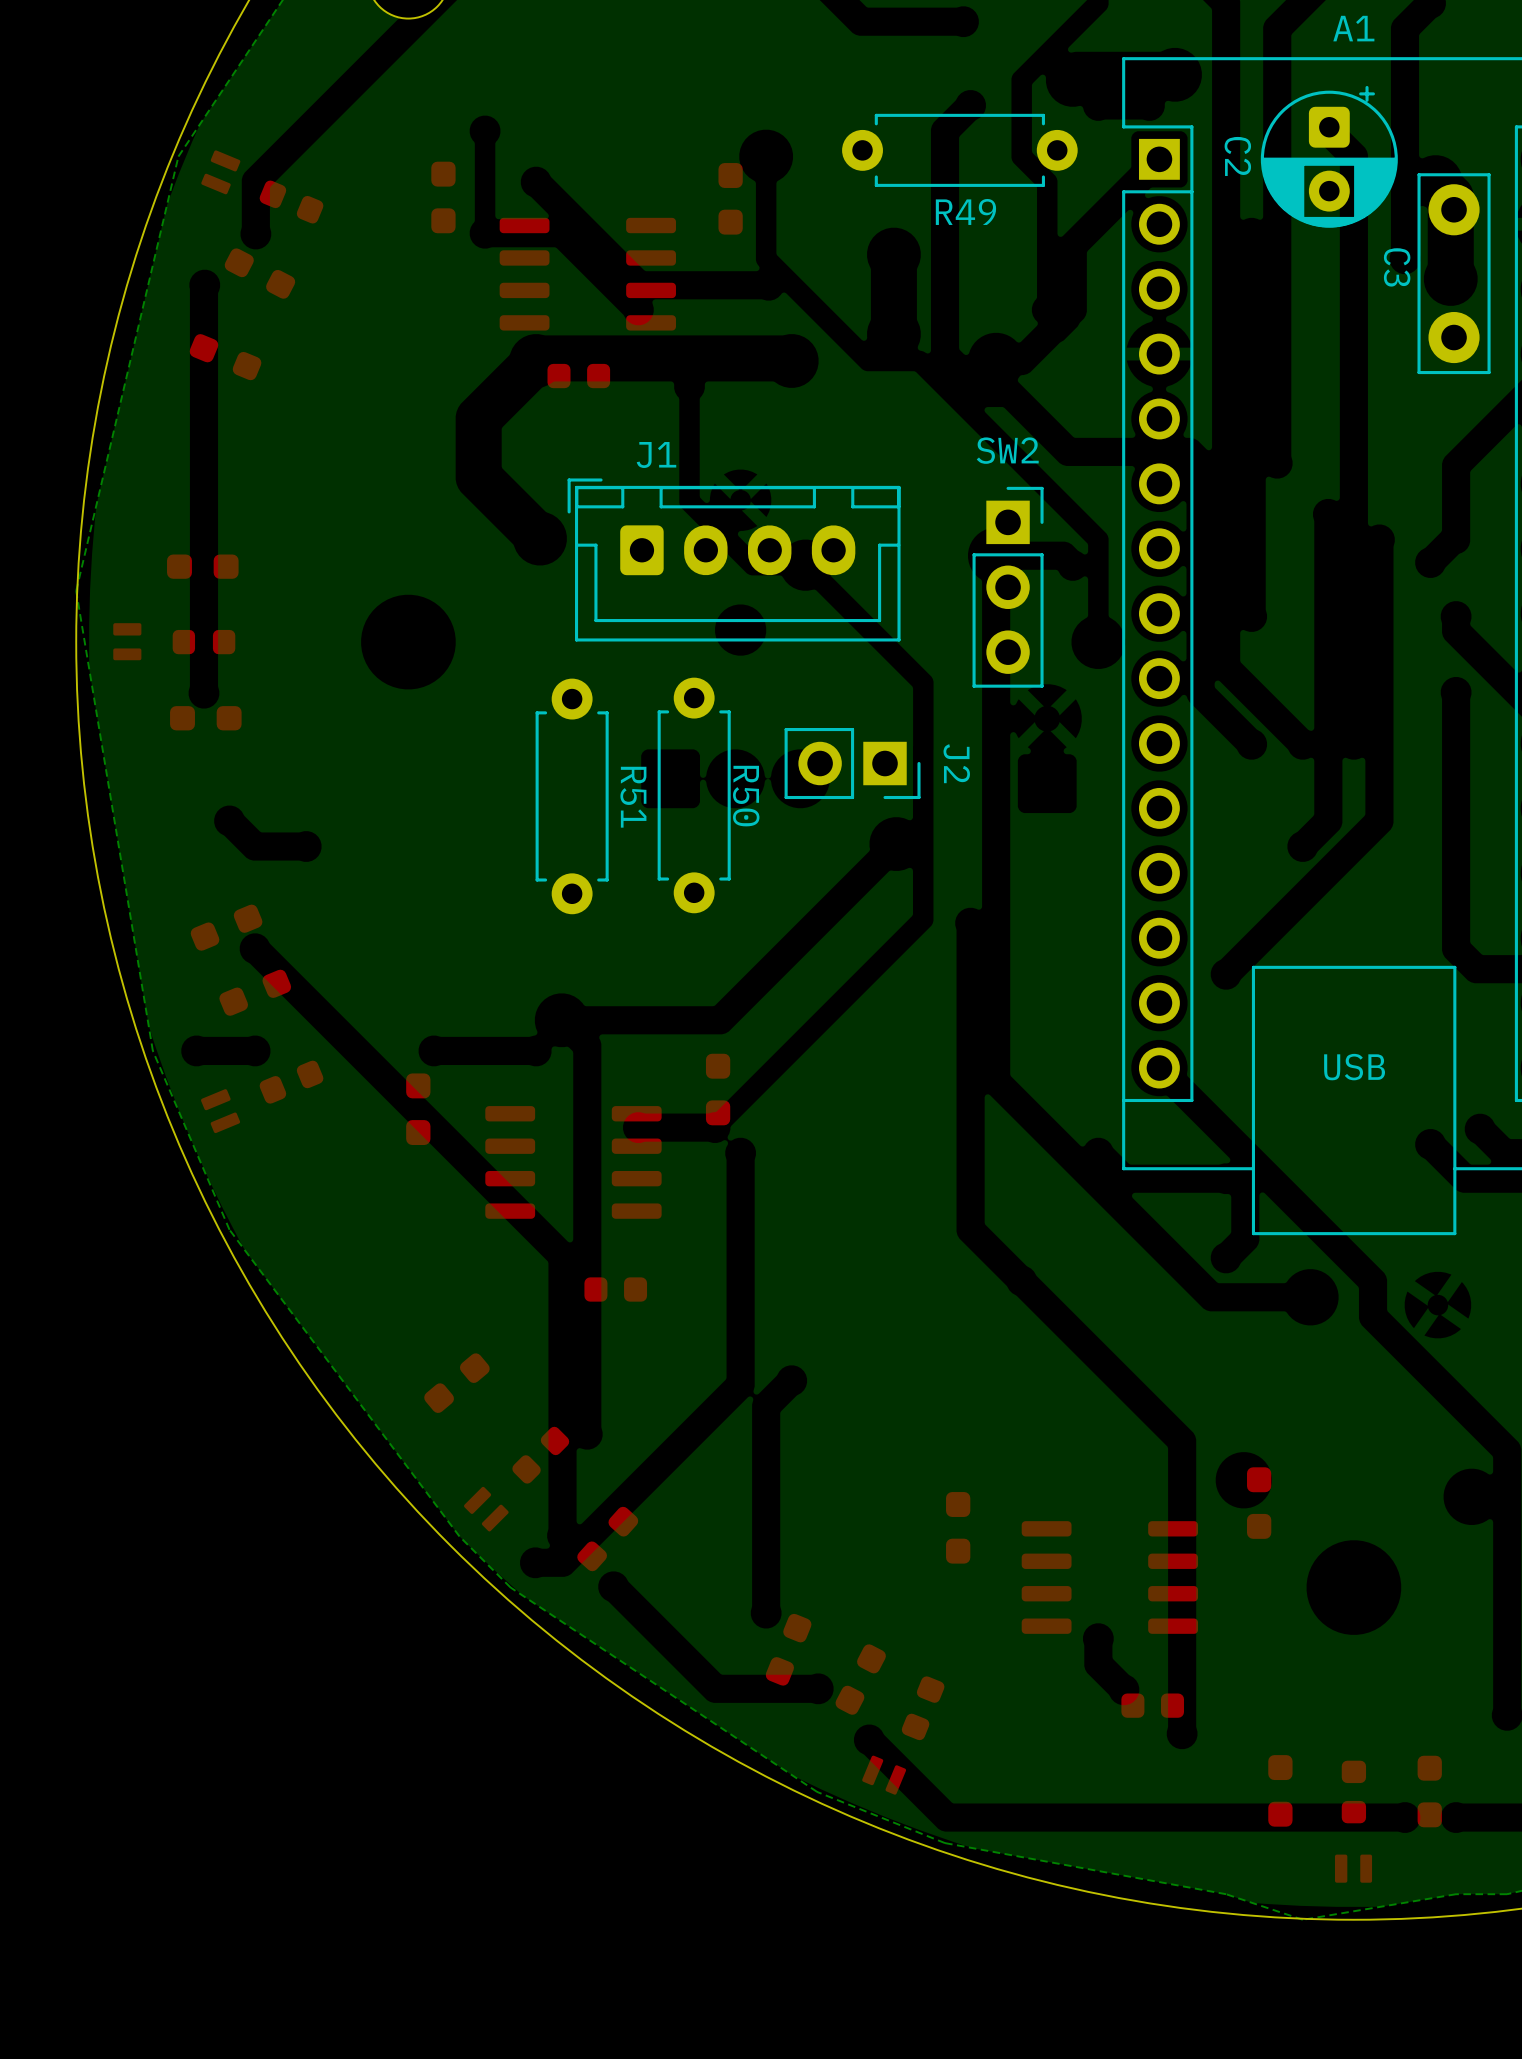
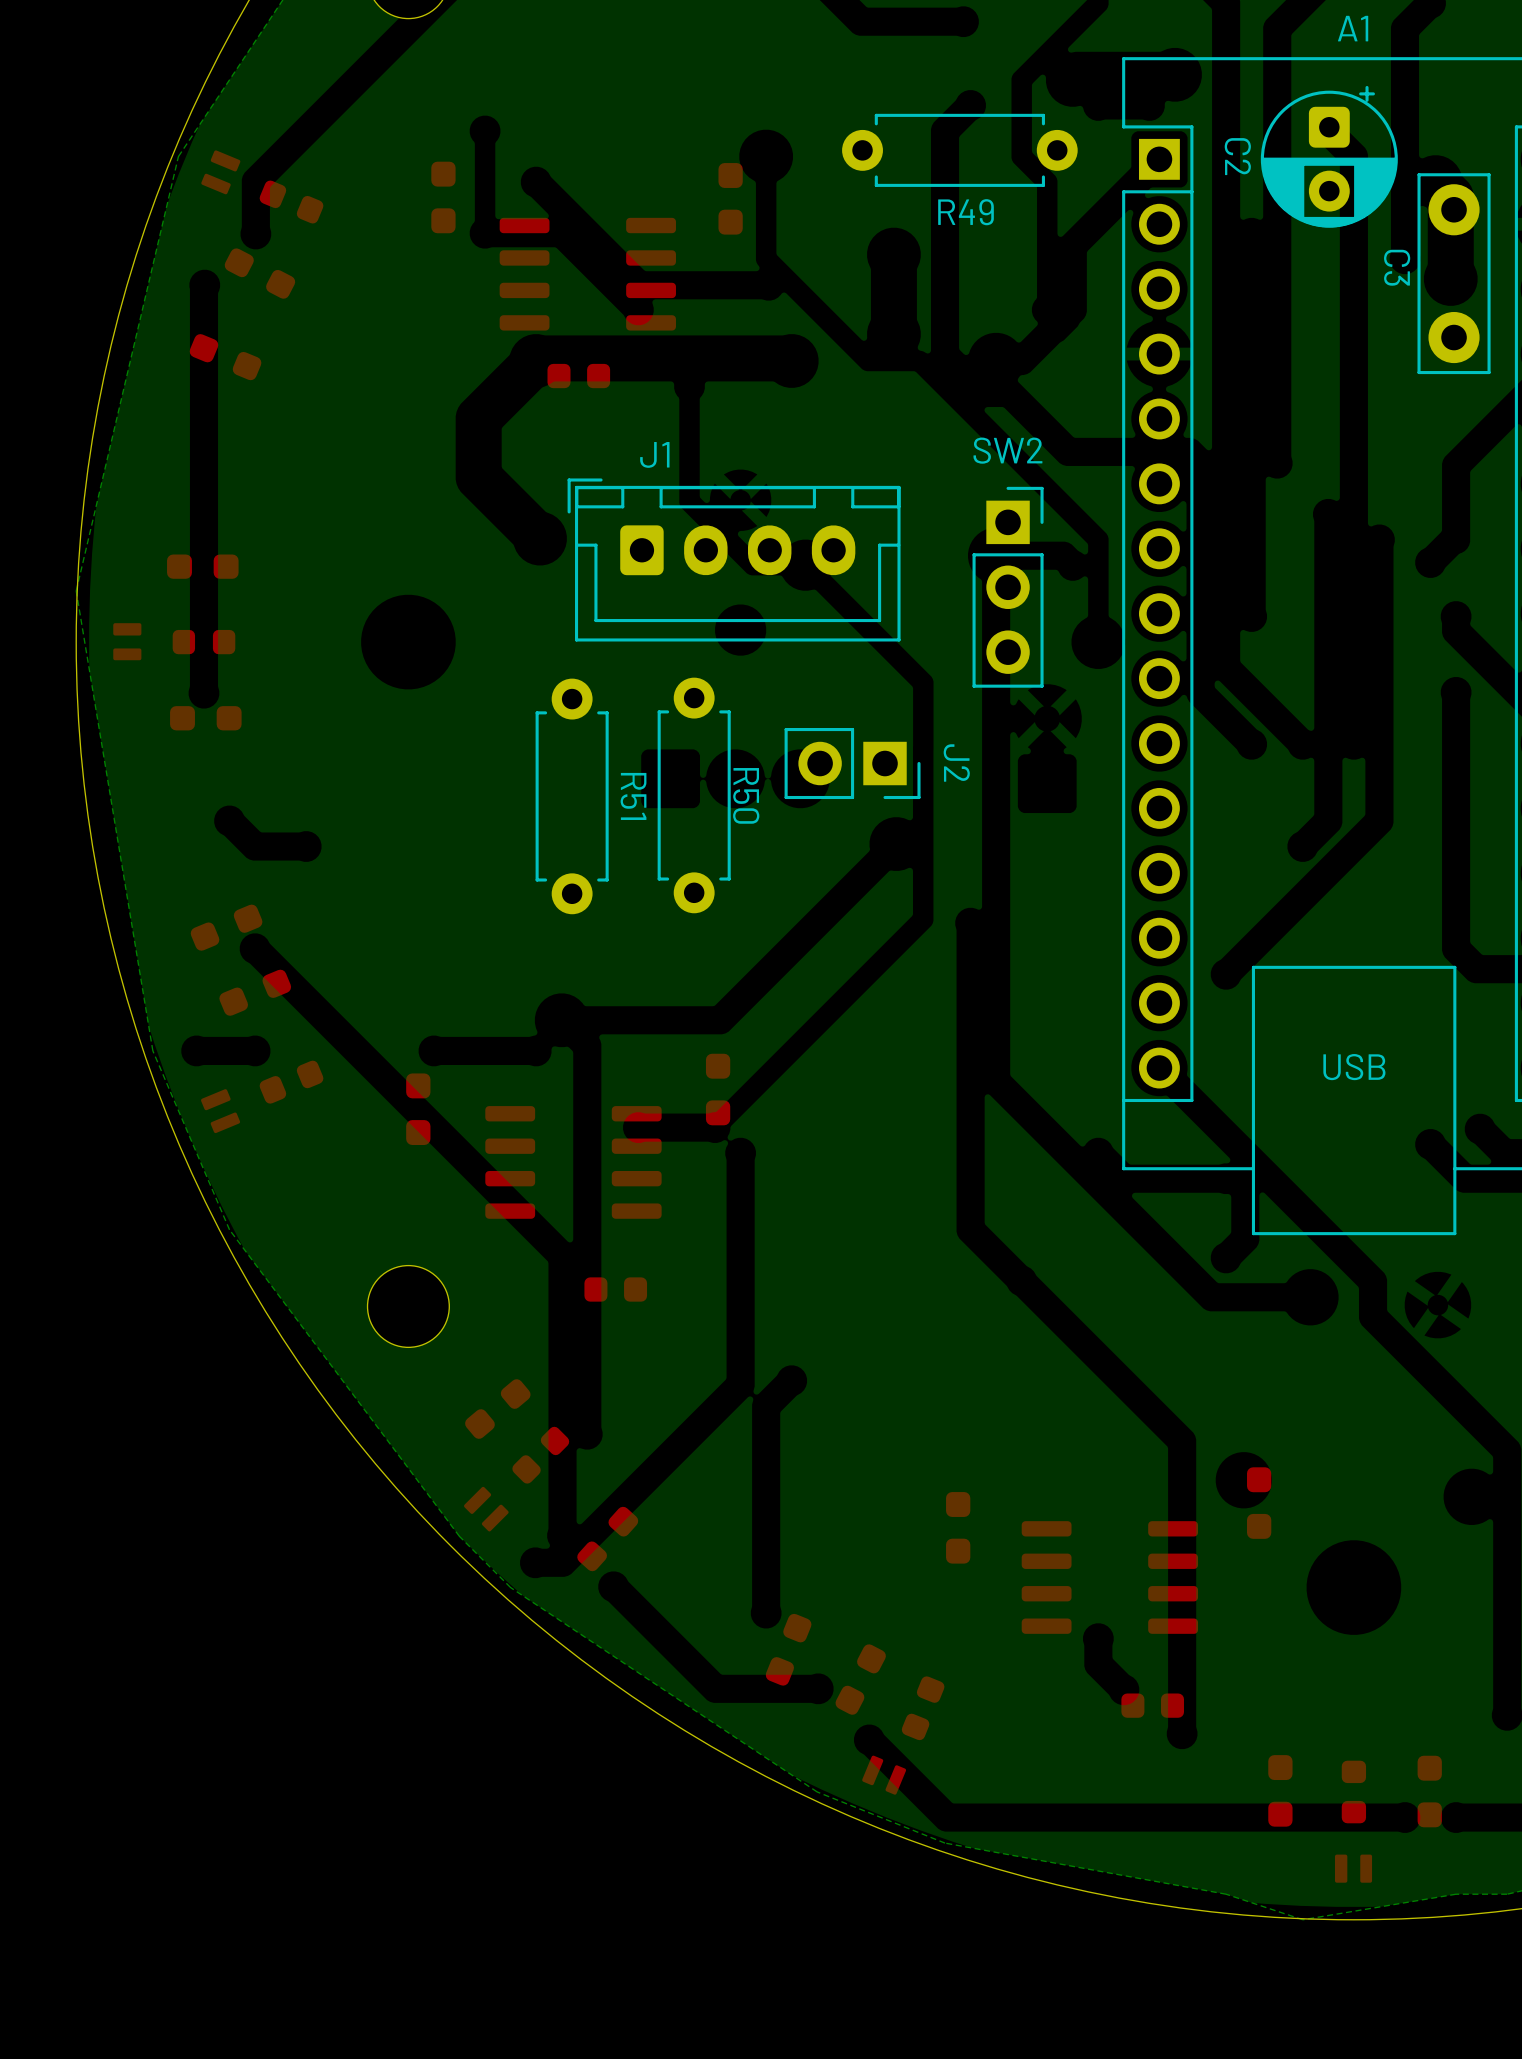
part: none -> (408, 1306)
part position: (456, 1383) -> (497, 1409)

